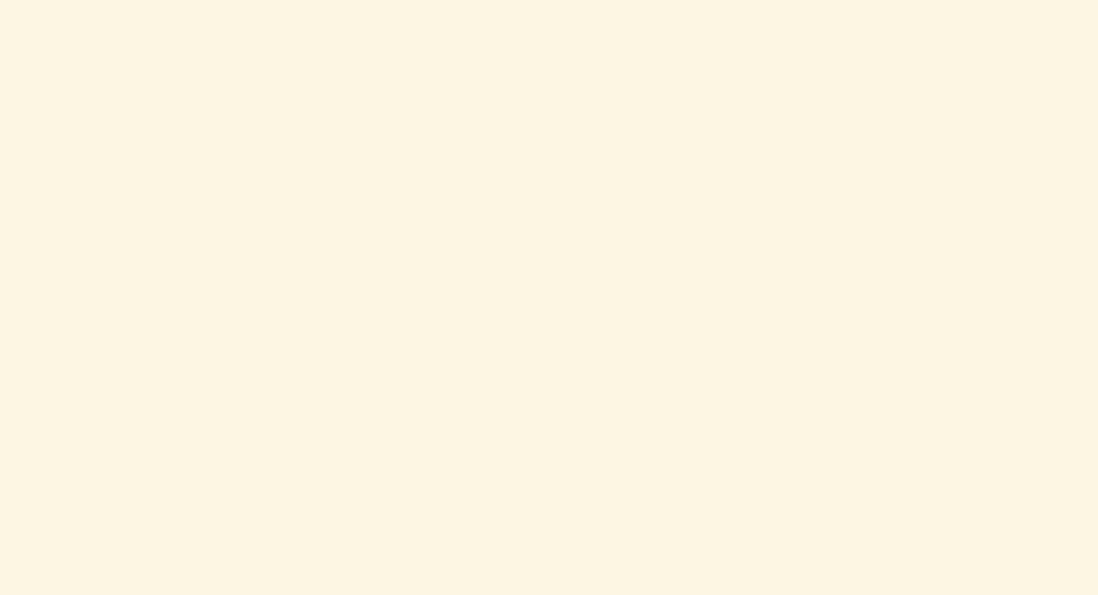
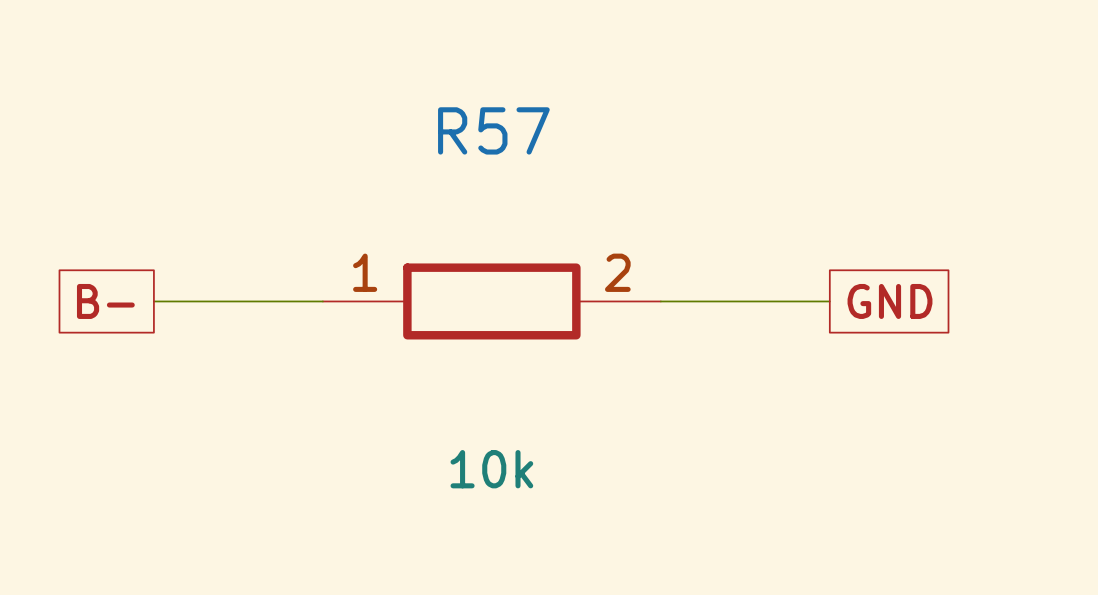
global label: none -> B- (105, 301)
wire: none -> (153, 301) (322, 301)
R57: none -> 10k (491, 301)
wire: none -> (660, 301) (829, 301)
global label: none -> GND (890, 301)

